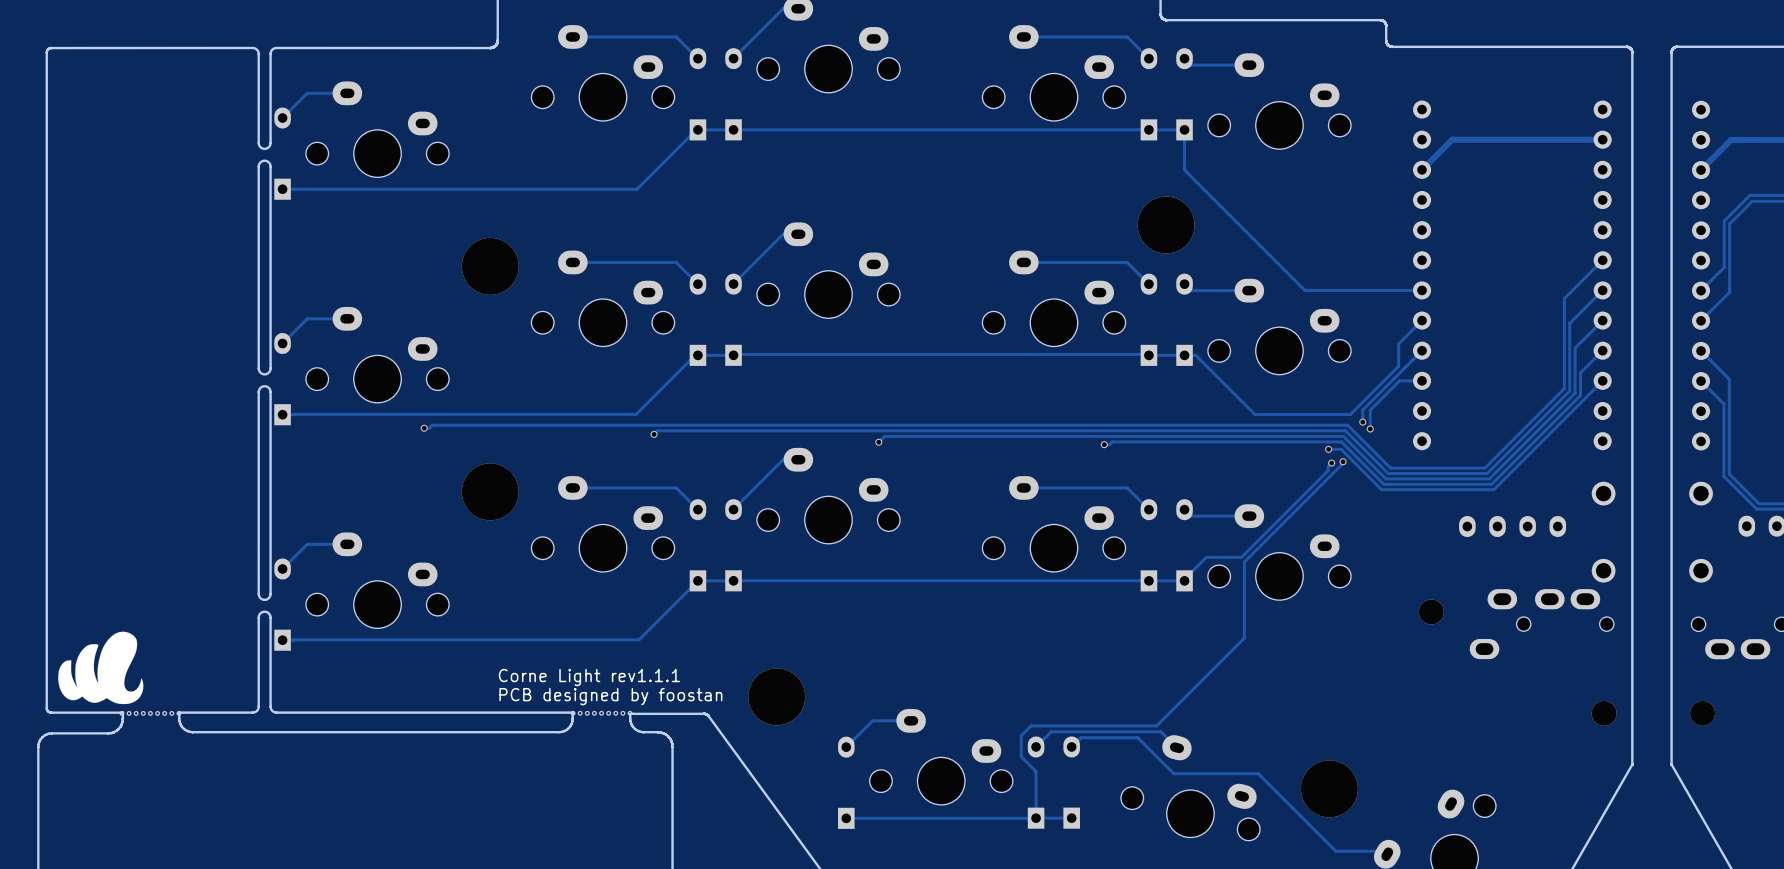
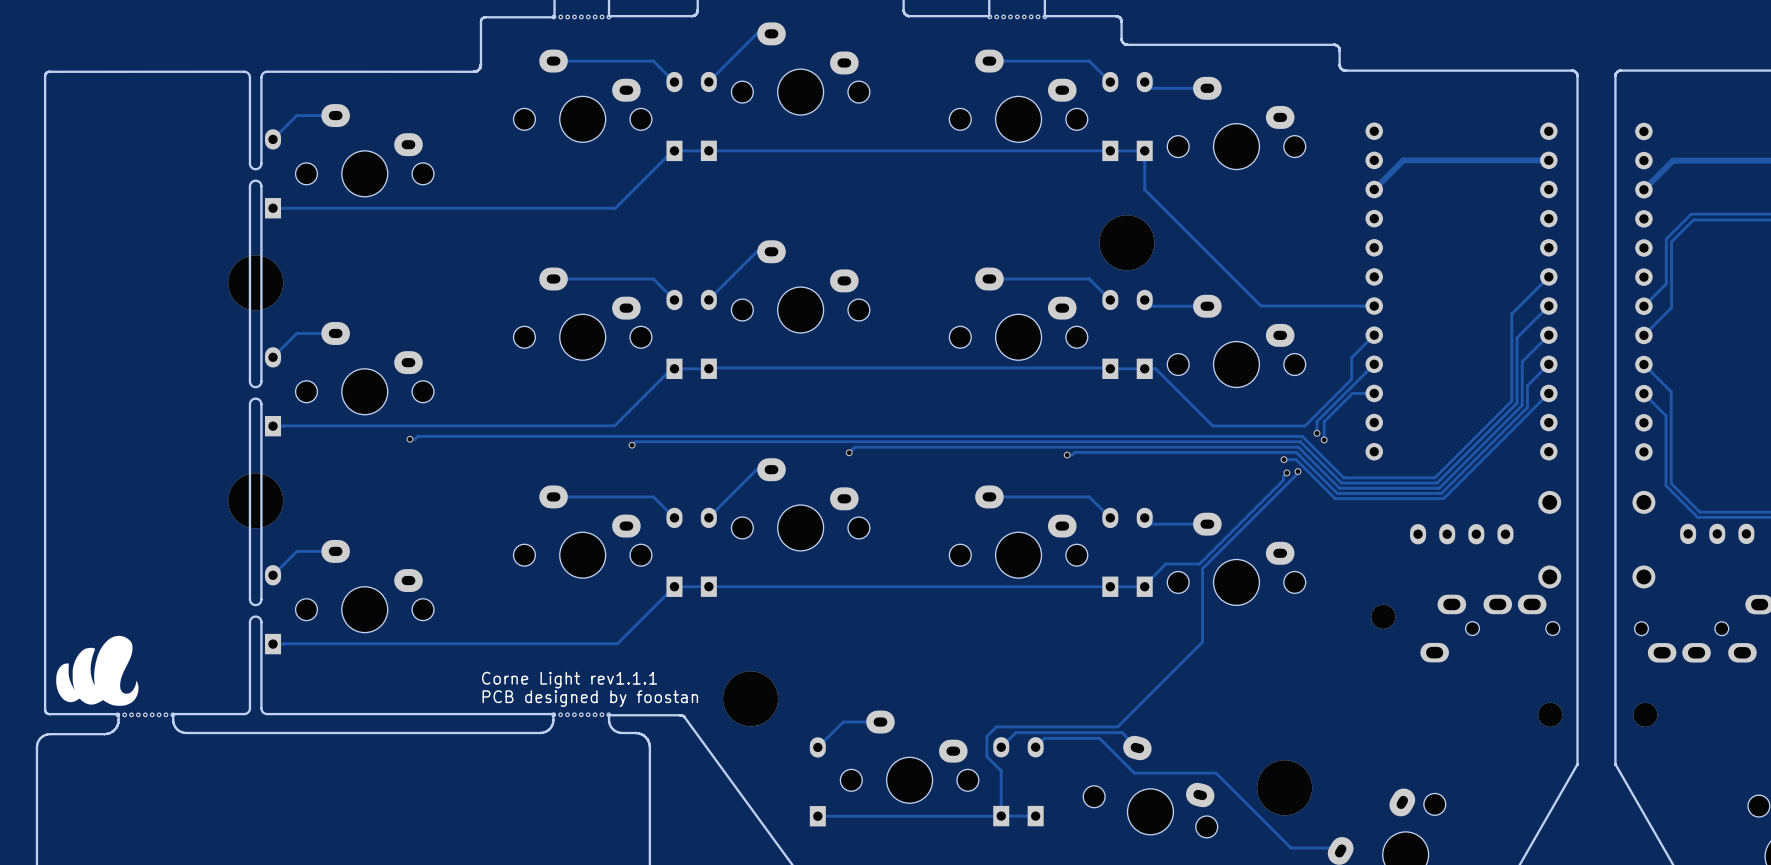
part: none -> (255, 282)
part: (490, 266) -> none
part: none -> (255, 500)
part: (490, 491) -> none

